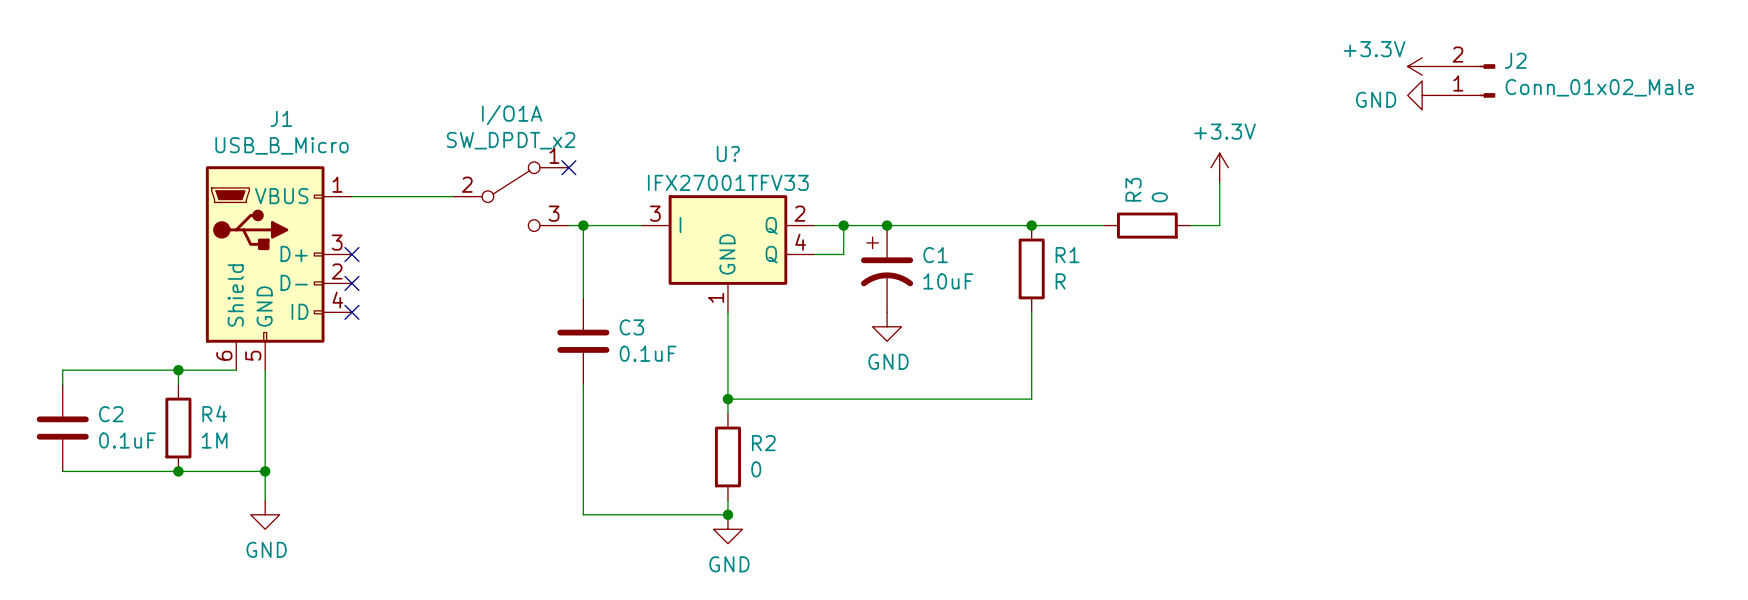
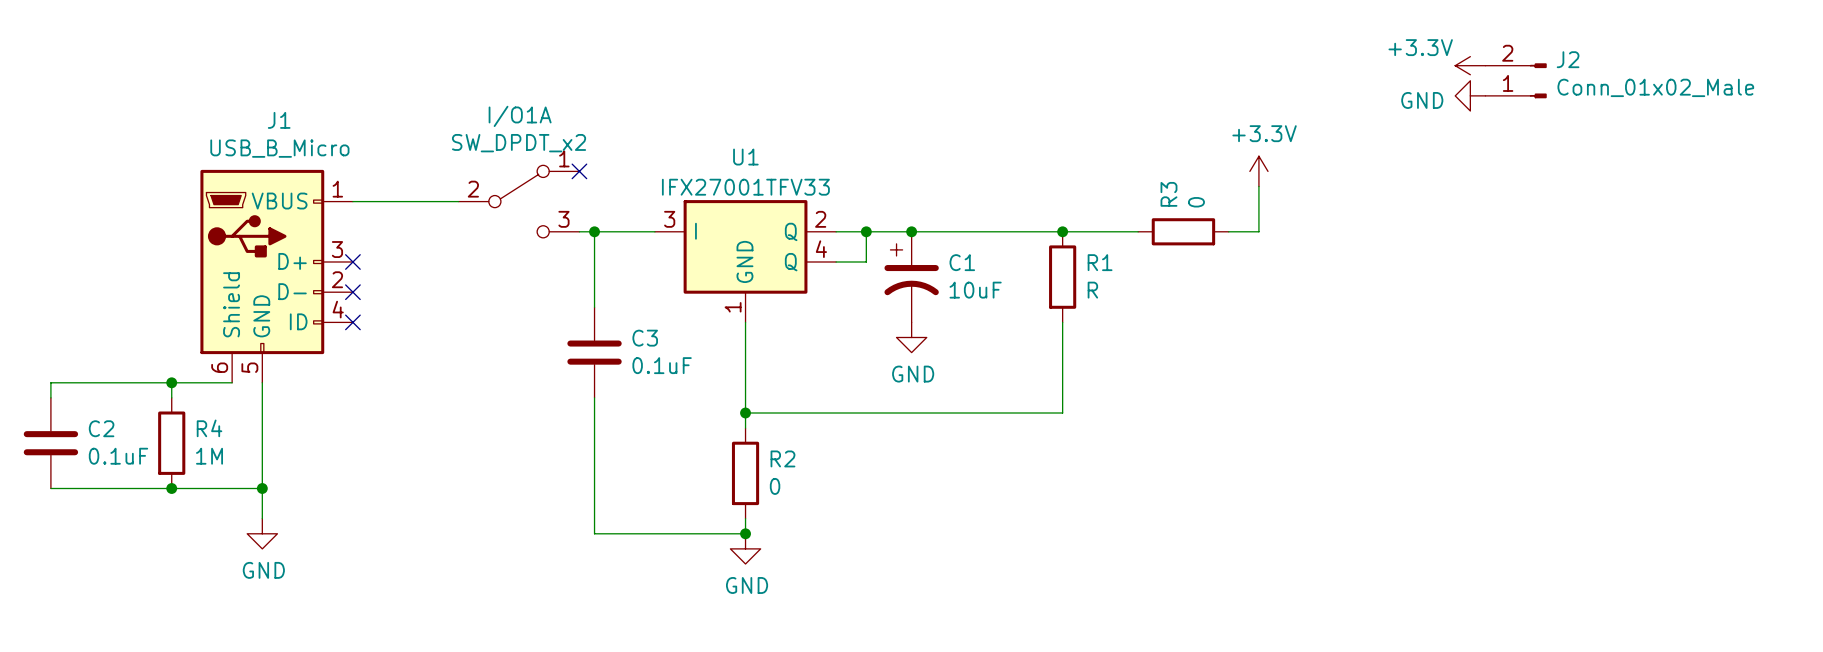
U? name: U? (728, 153) -> U1 (745, 157)

